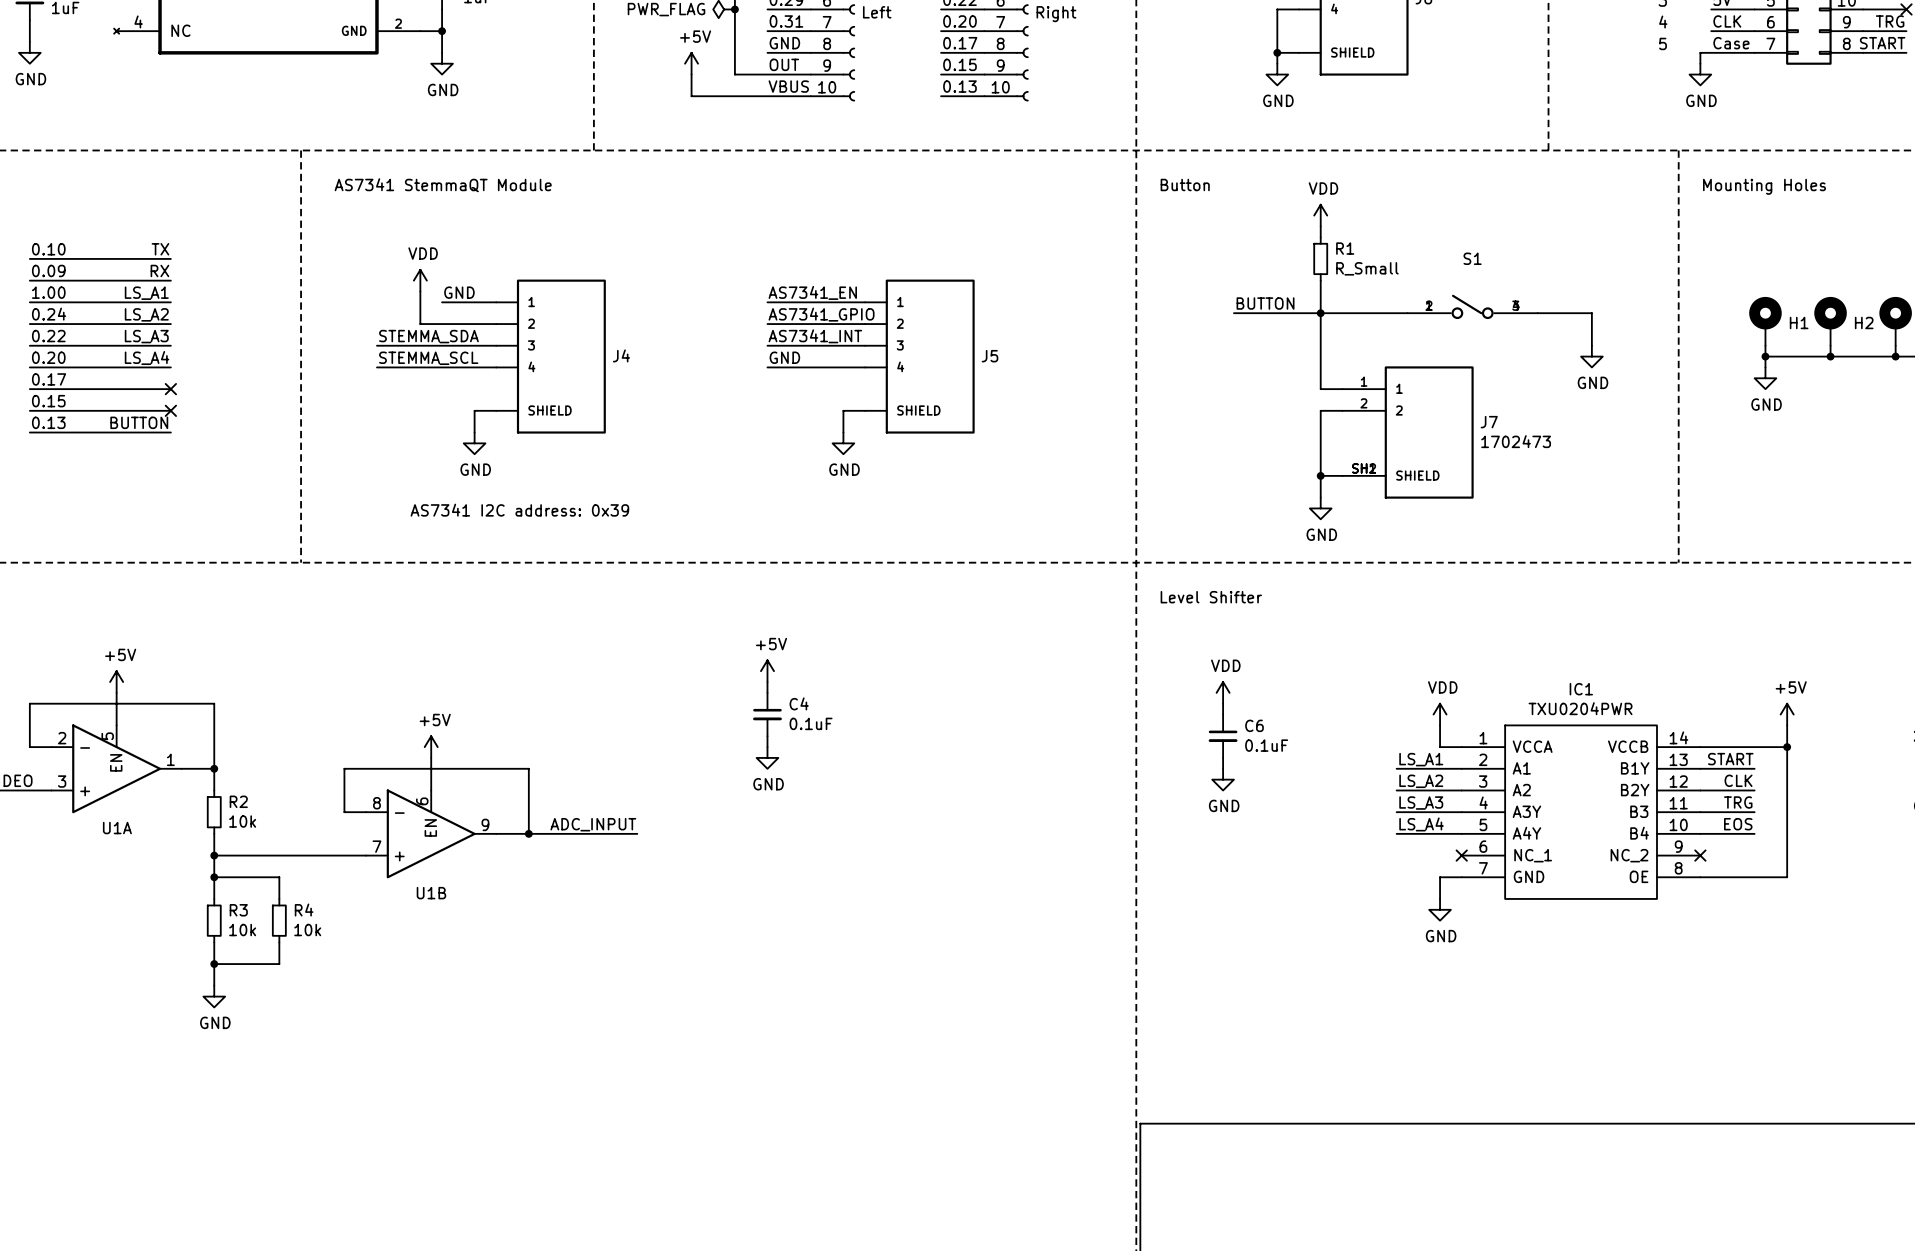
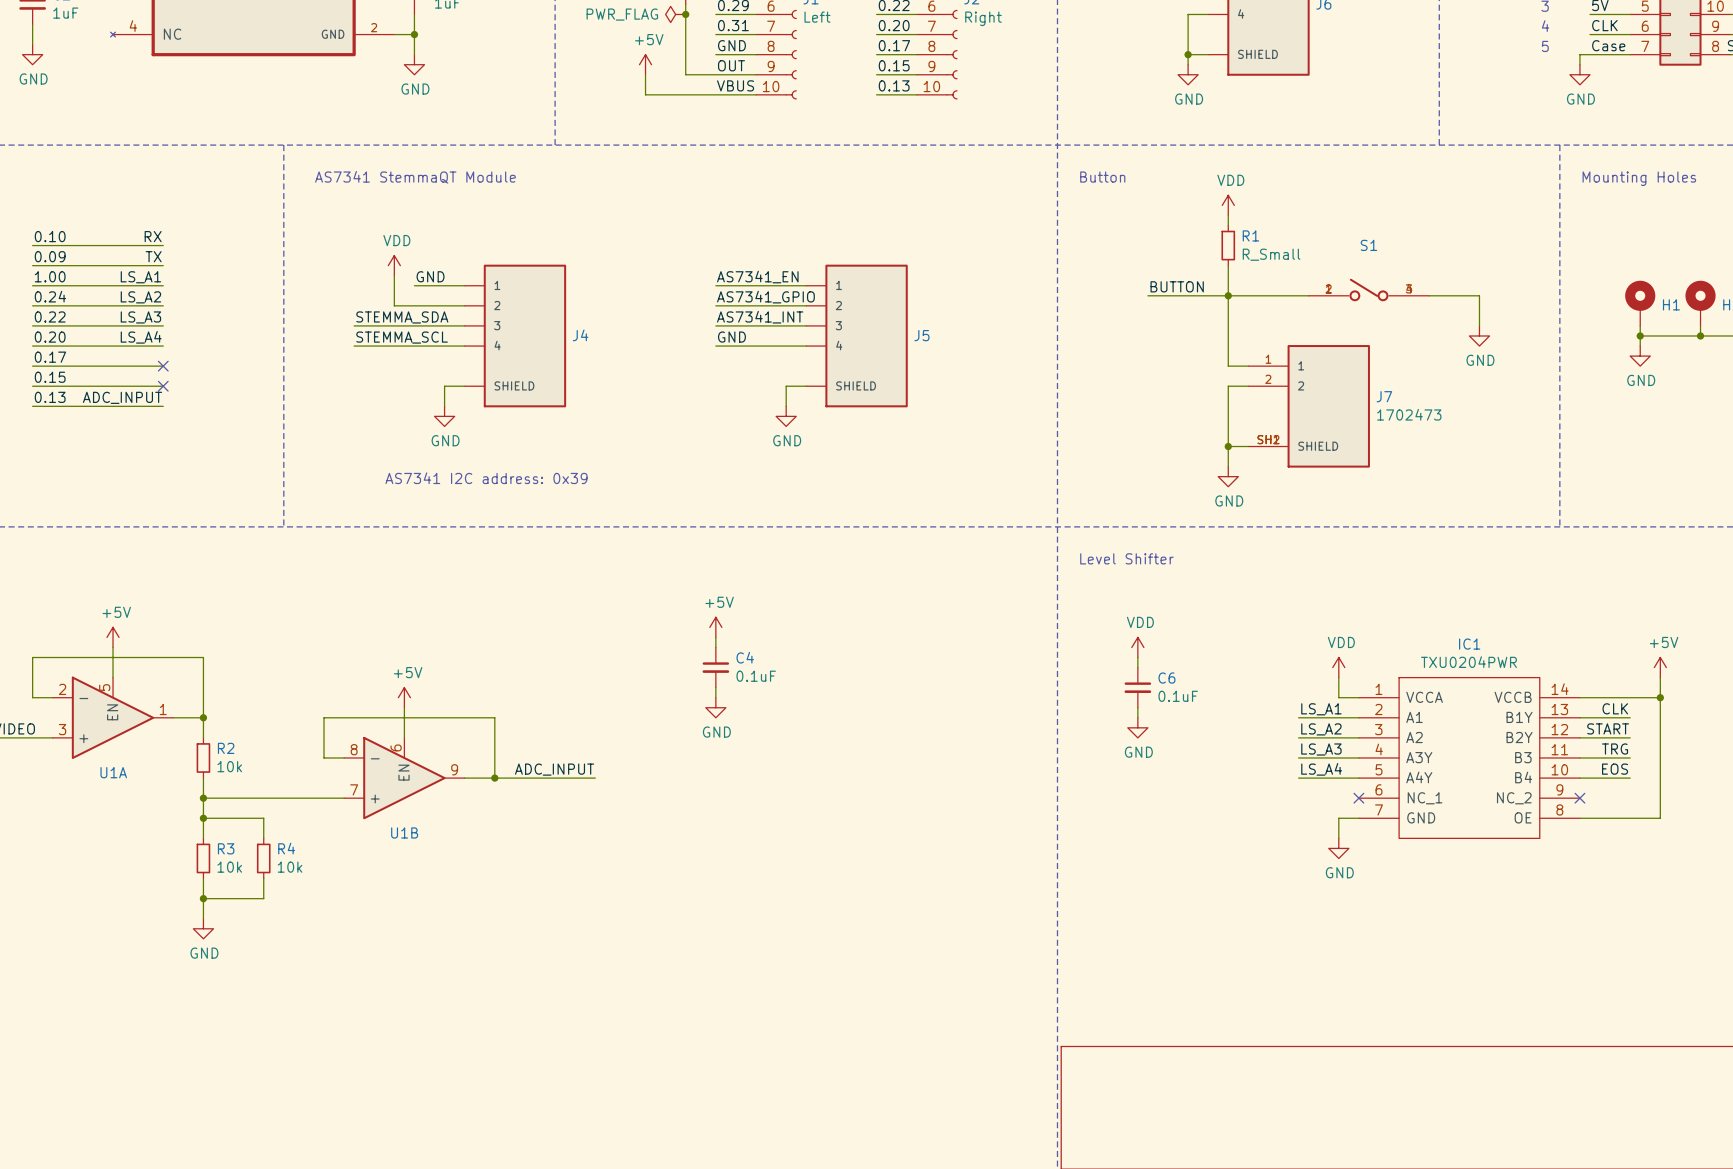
label: TX (160, 249) -> RX (153, 236)
label: RX (159, 270) -> TX (153, 256)
label: BUTTON (139, 422) -> ADC_INPUT (122, 397)
label: START (1730, 759) -> CLK (1615, 708)
label: CLK (1738, 780) -> START (1608, 728)

